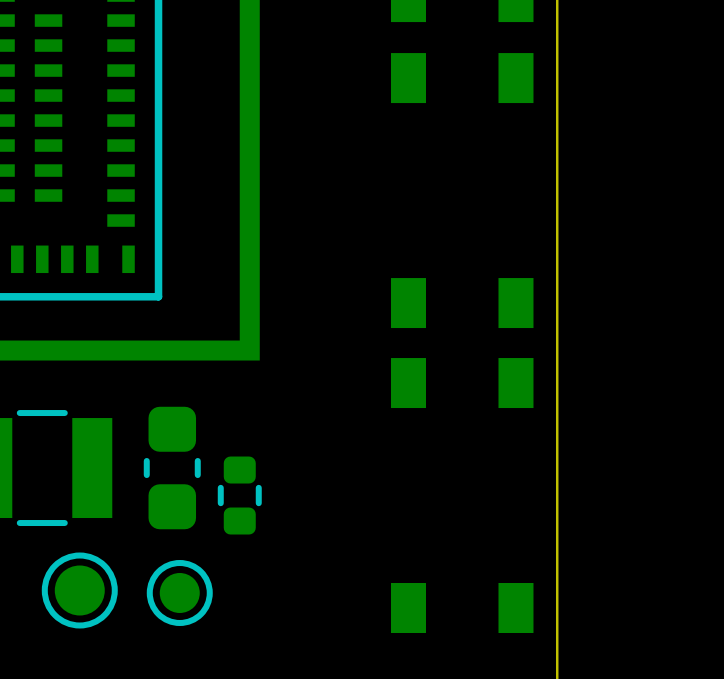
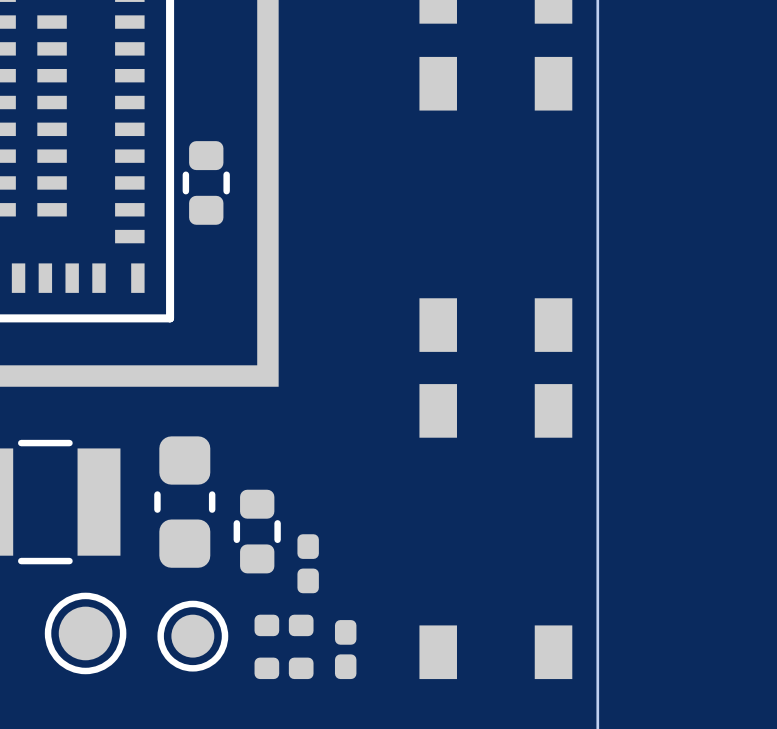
part: none -> (206, 182)
part: none -> (308, 563)
part: none -> (284, 625)
part: none -> (345, 649)
part: none -> (284, 668)

